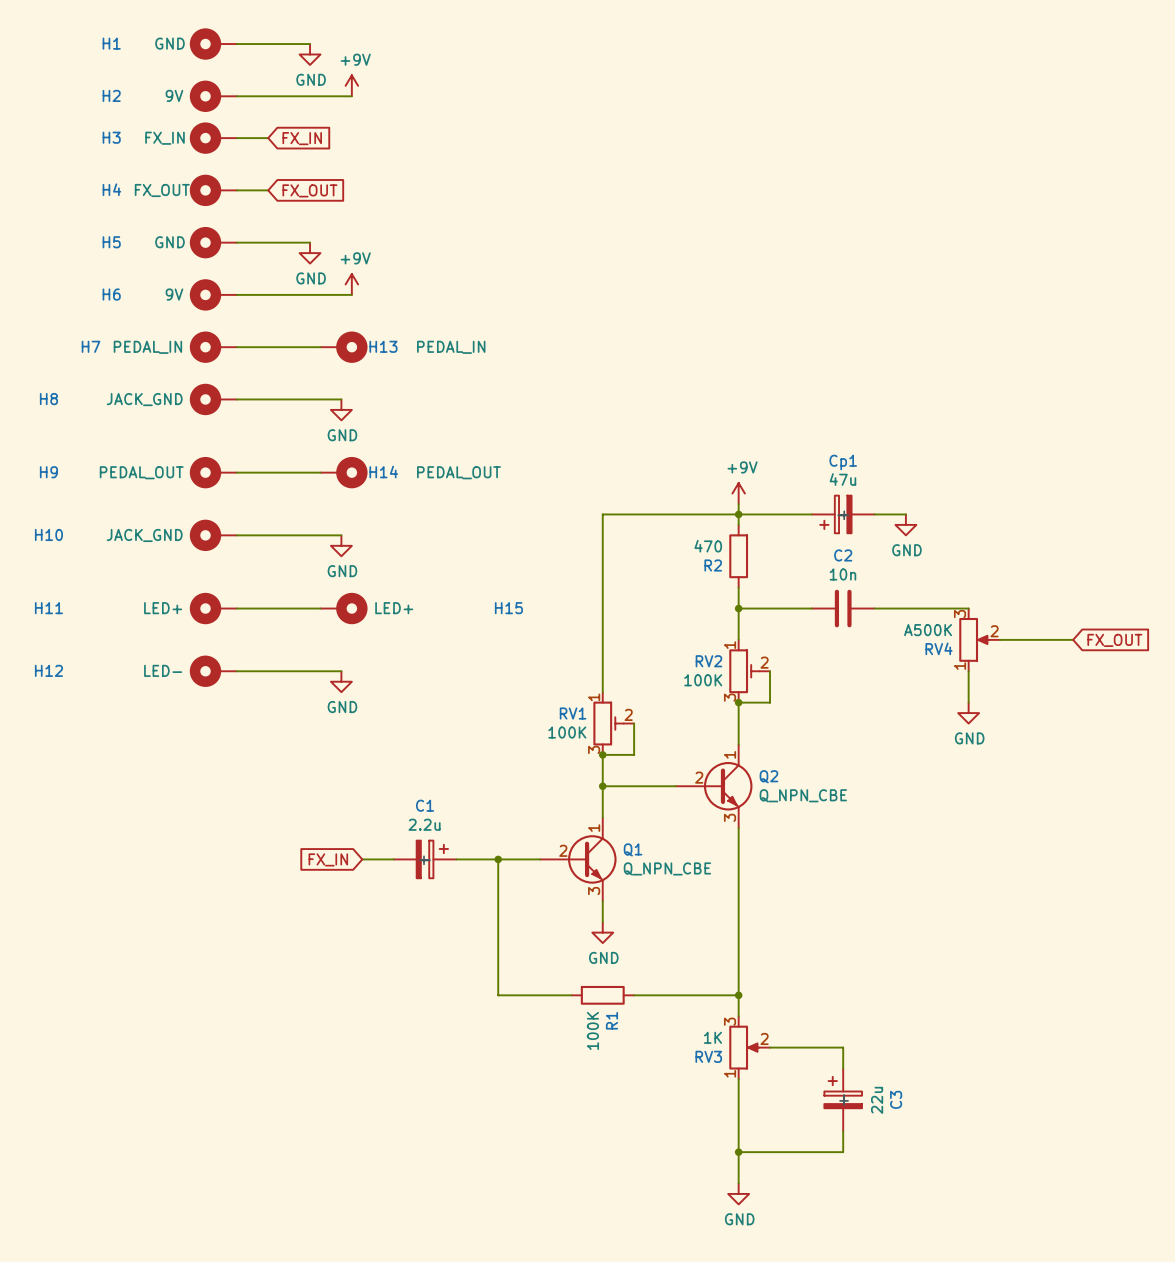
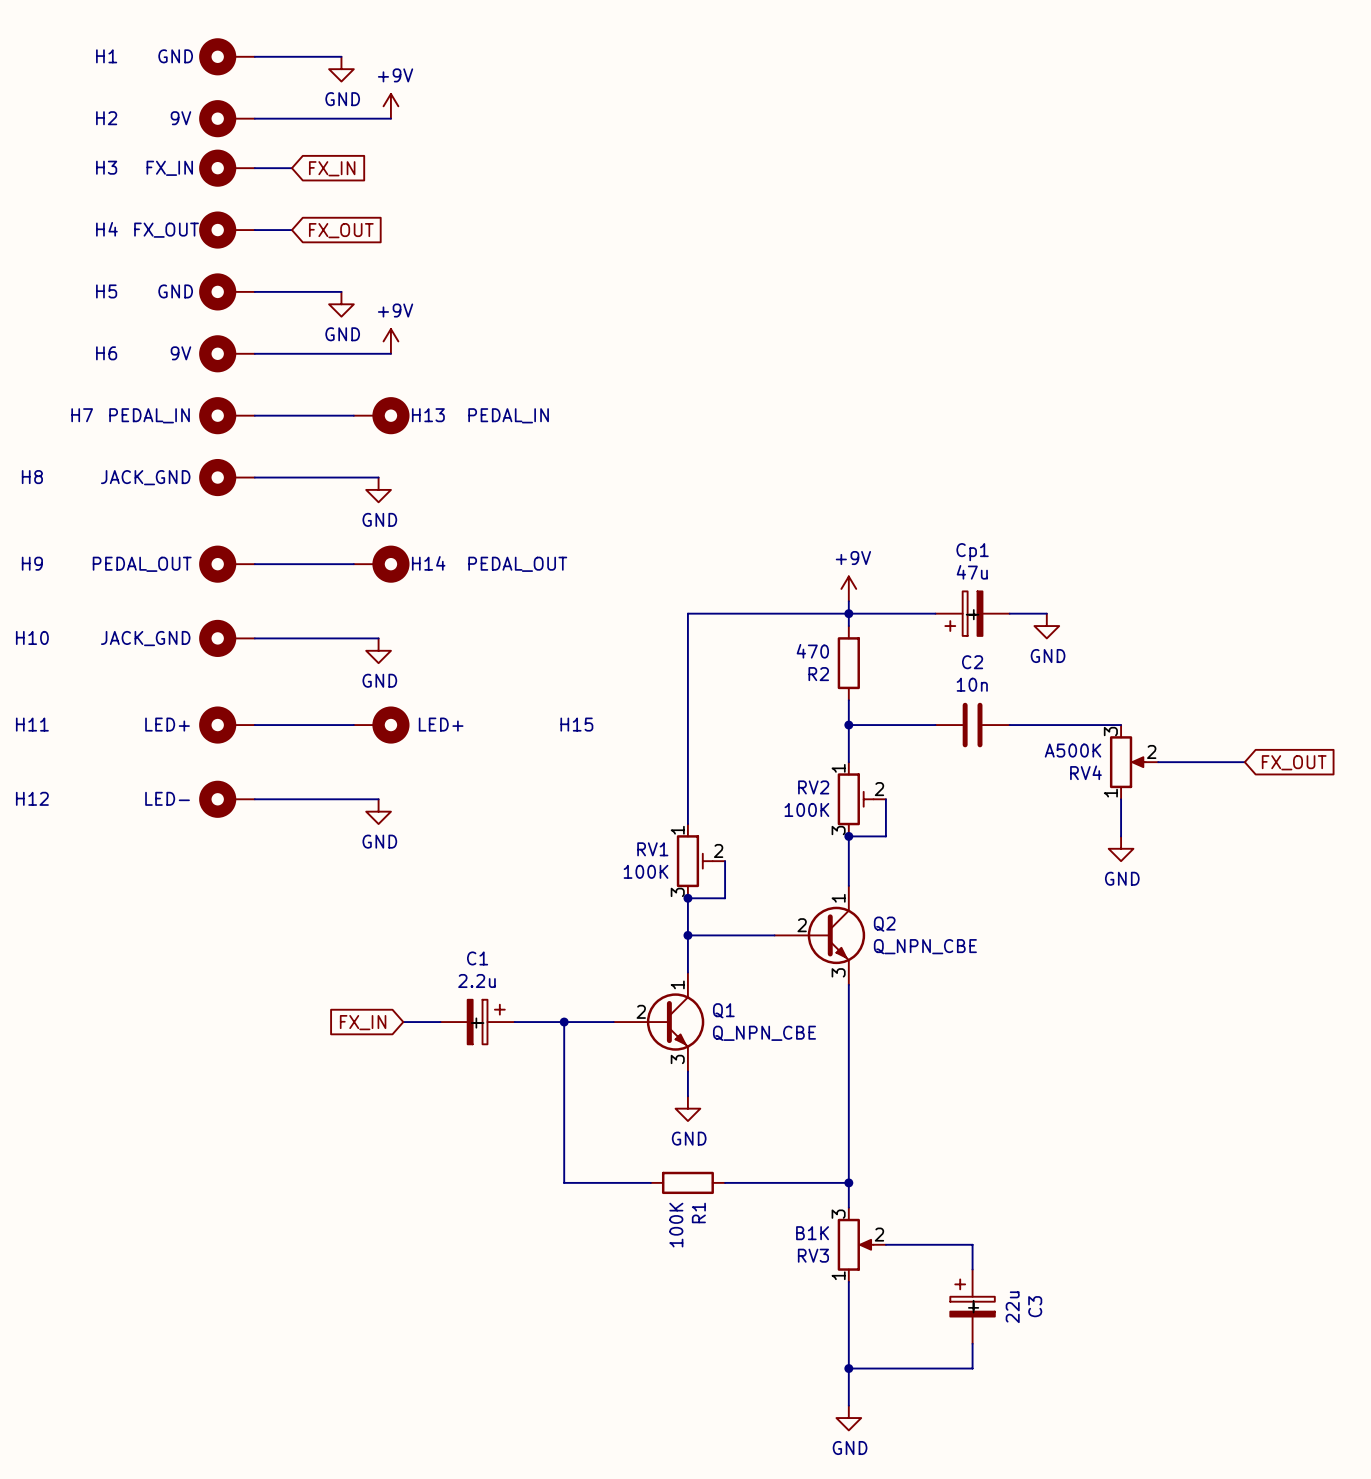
RV3 value: 1K (712, 1037) -> B1K (812, 1233)

